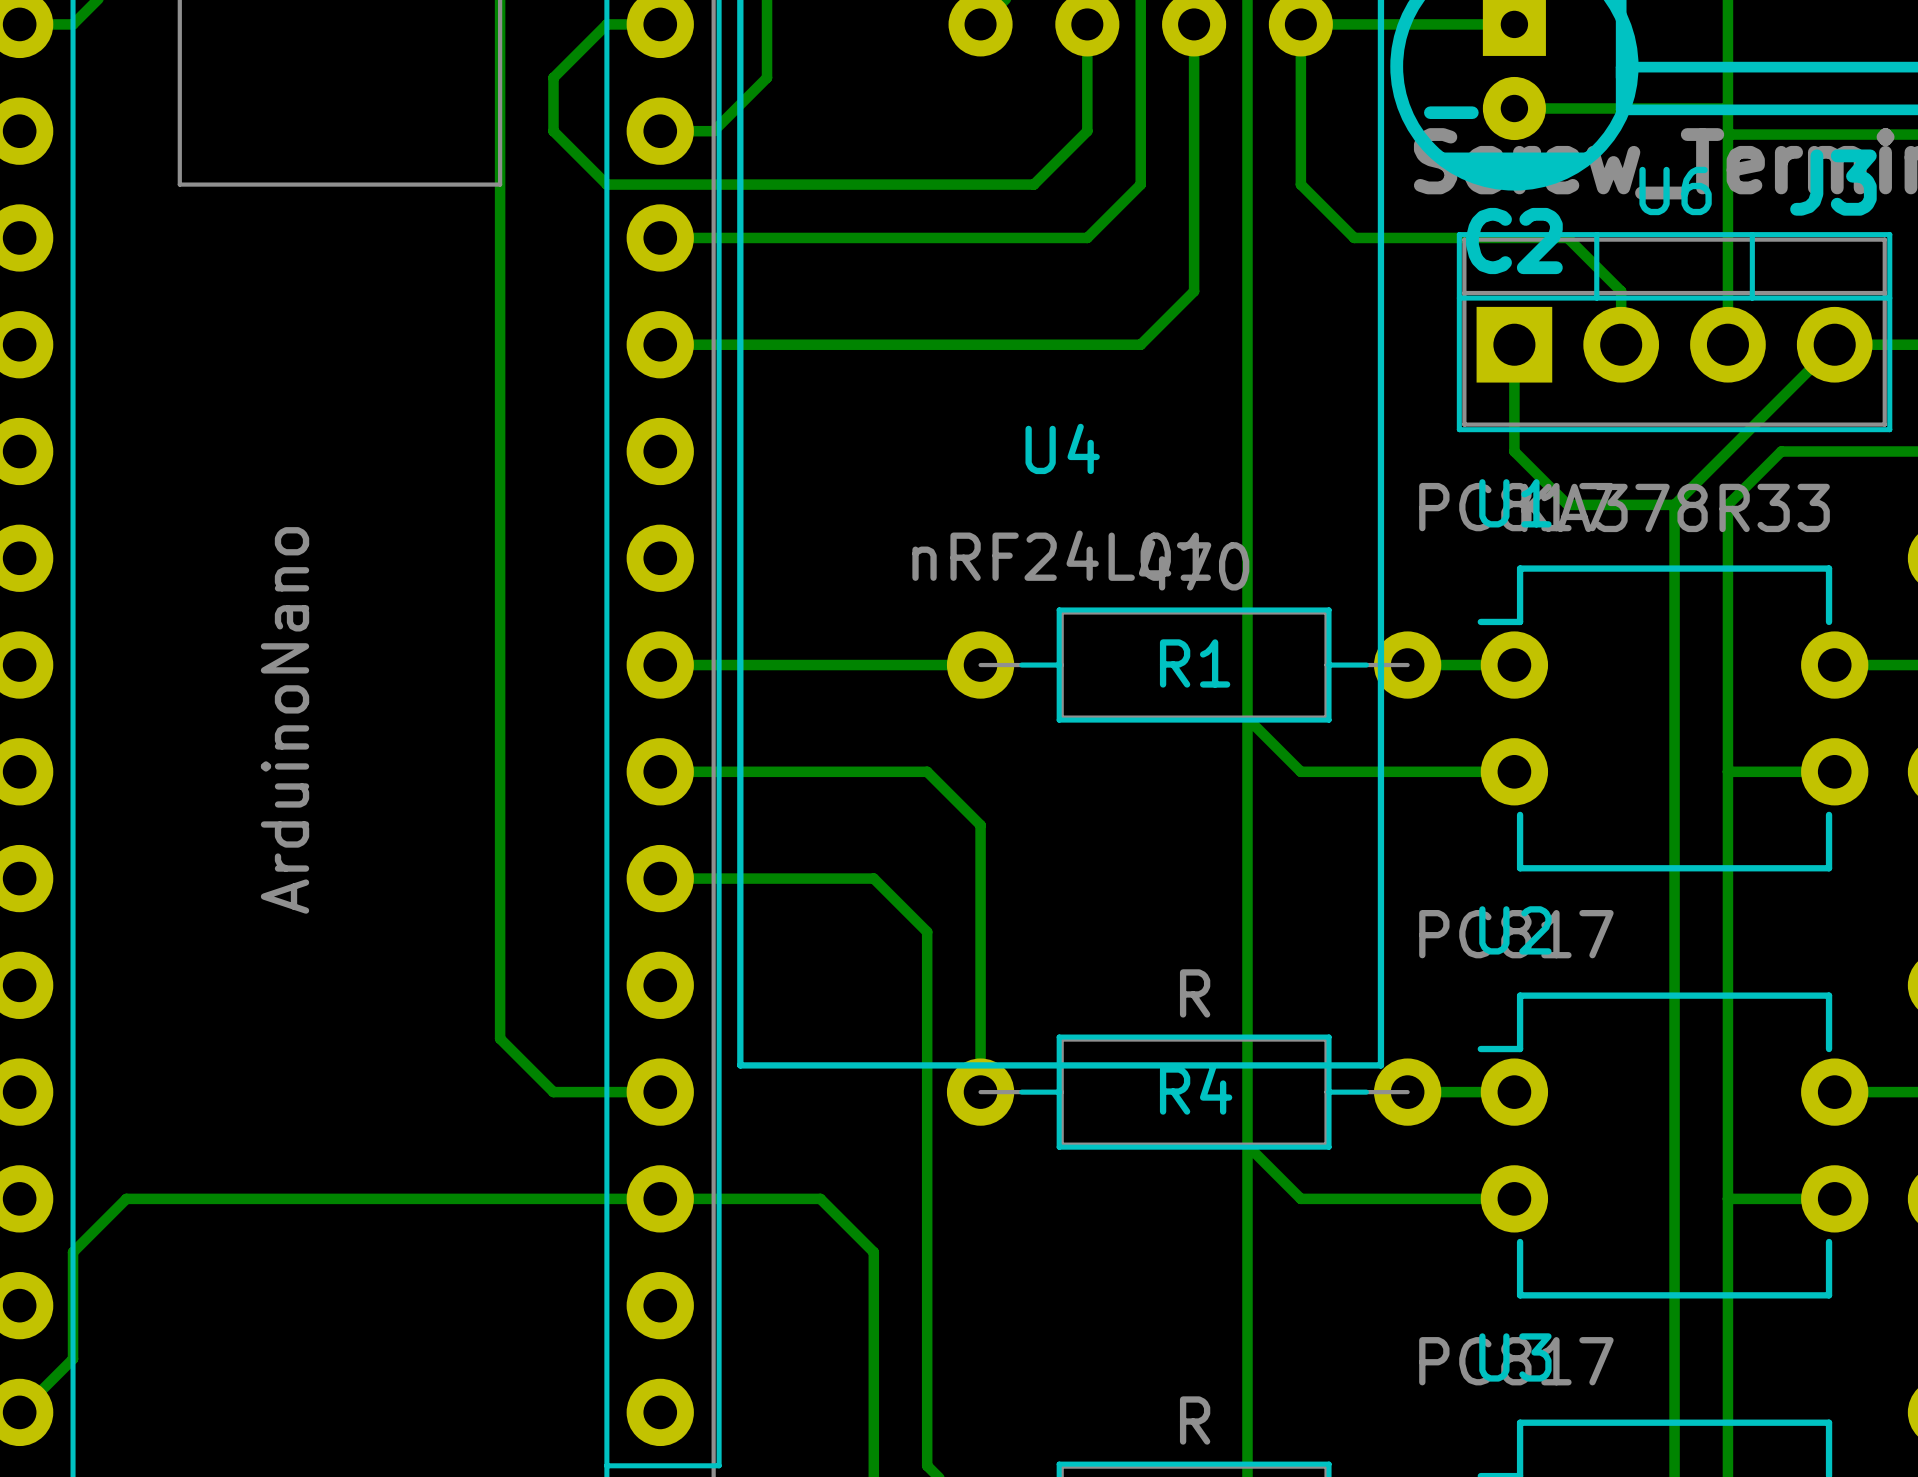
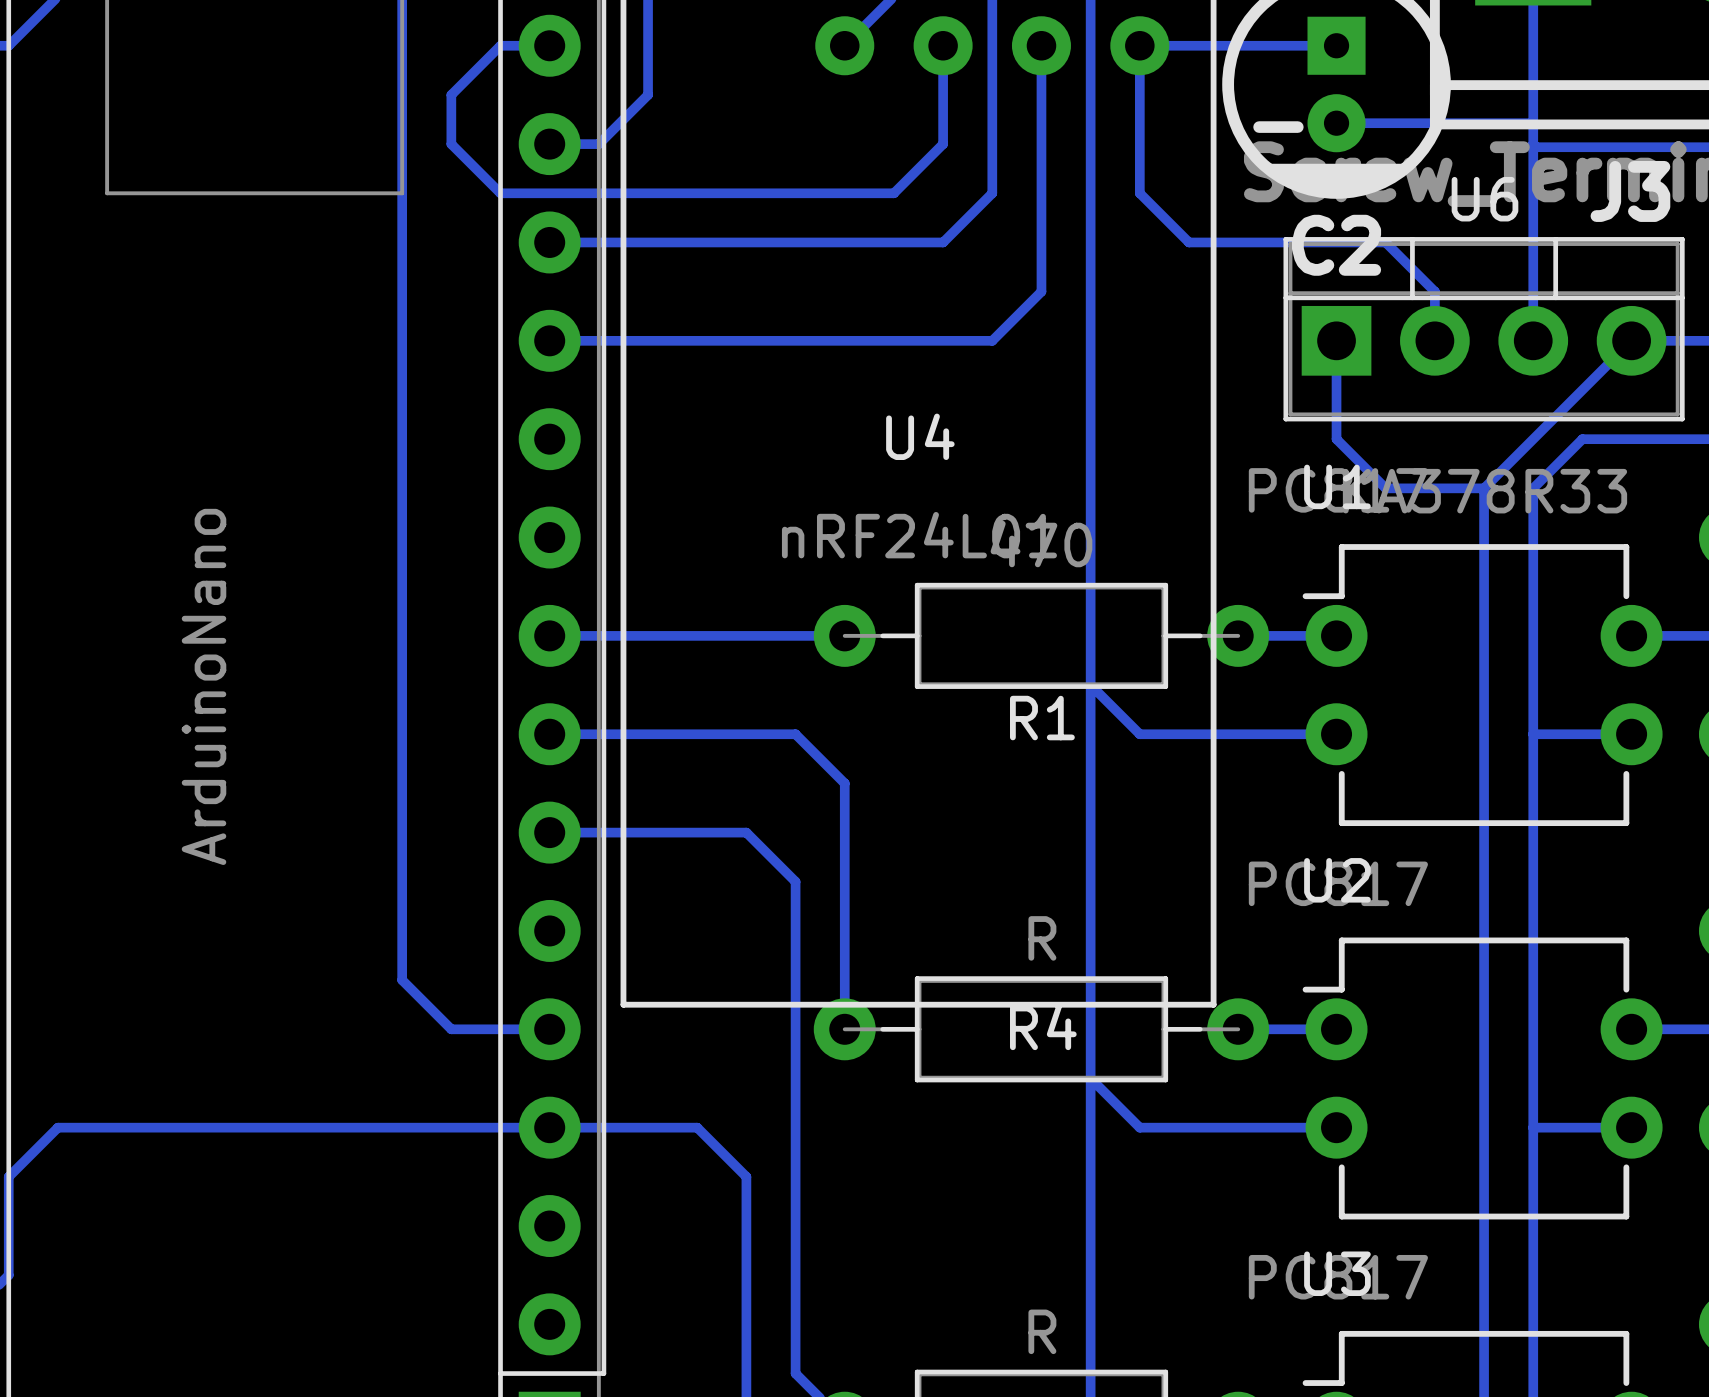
R1 name position: R1 (1195, 663) -> R1 (1042, 718)

